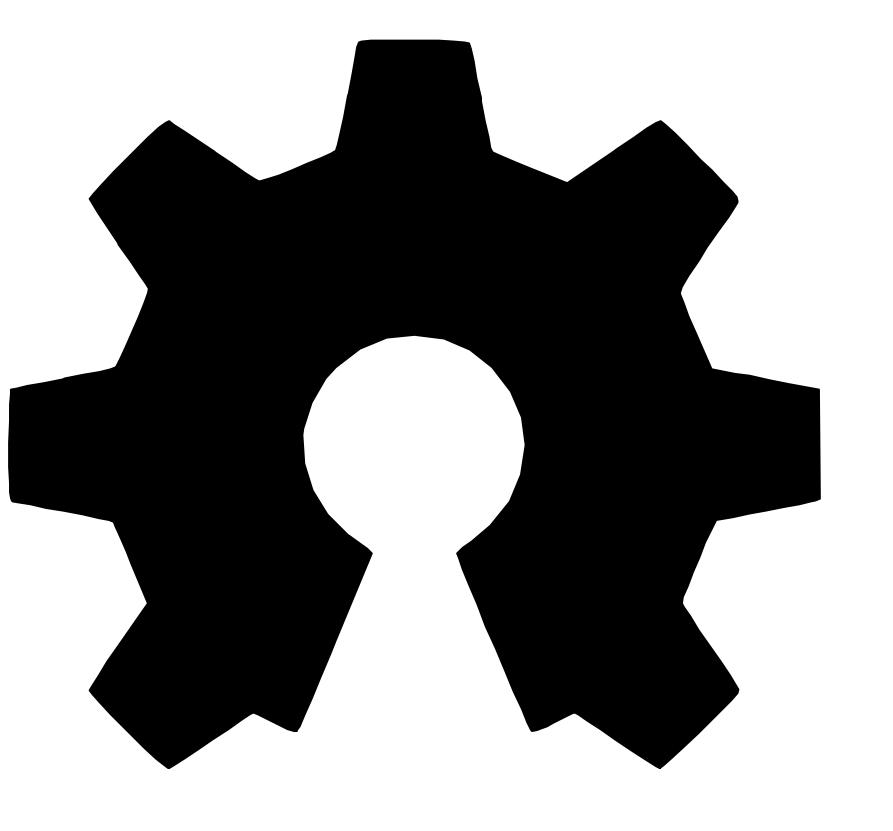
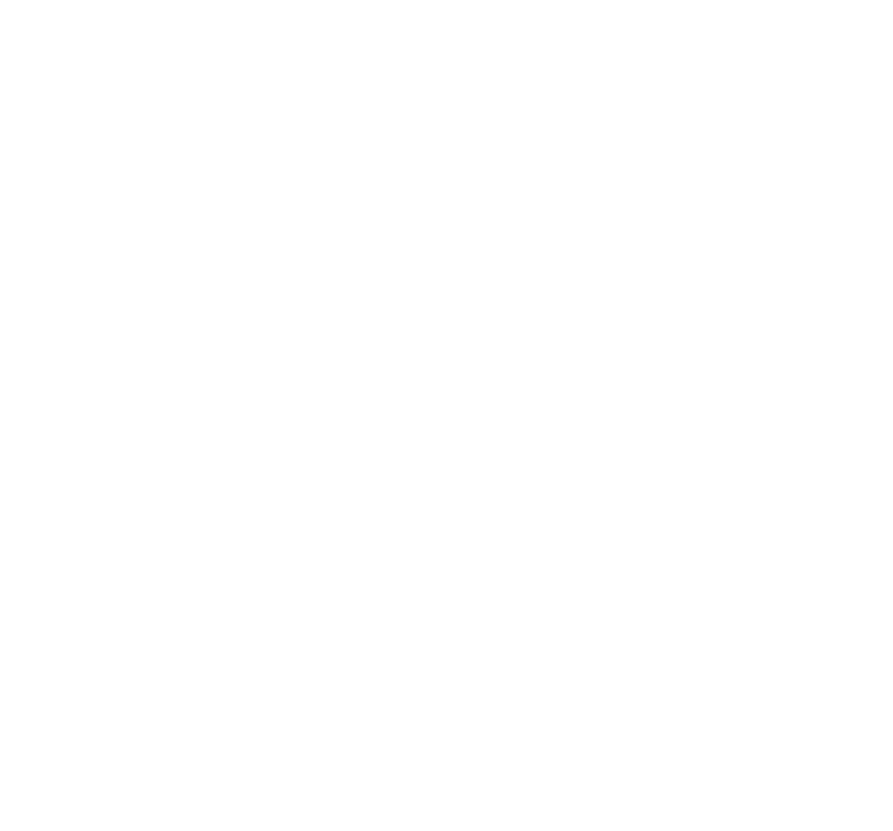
power symbol: (414, 404) -> none

